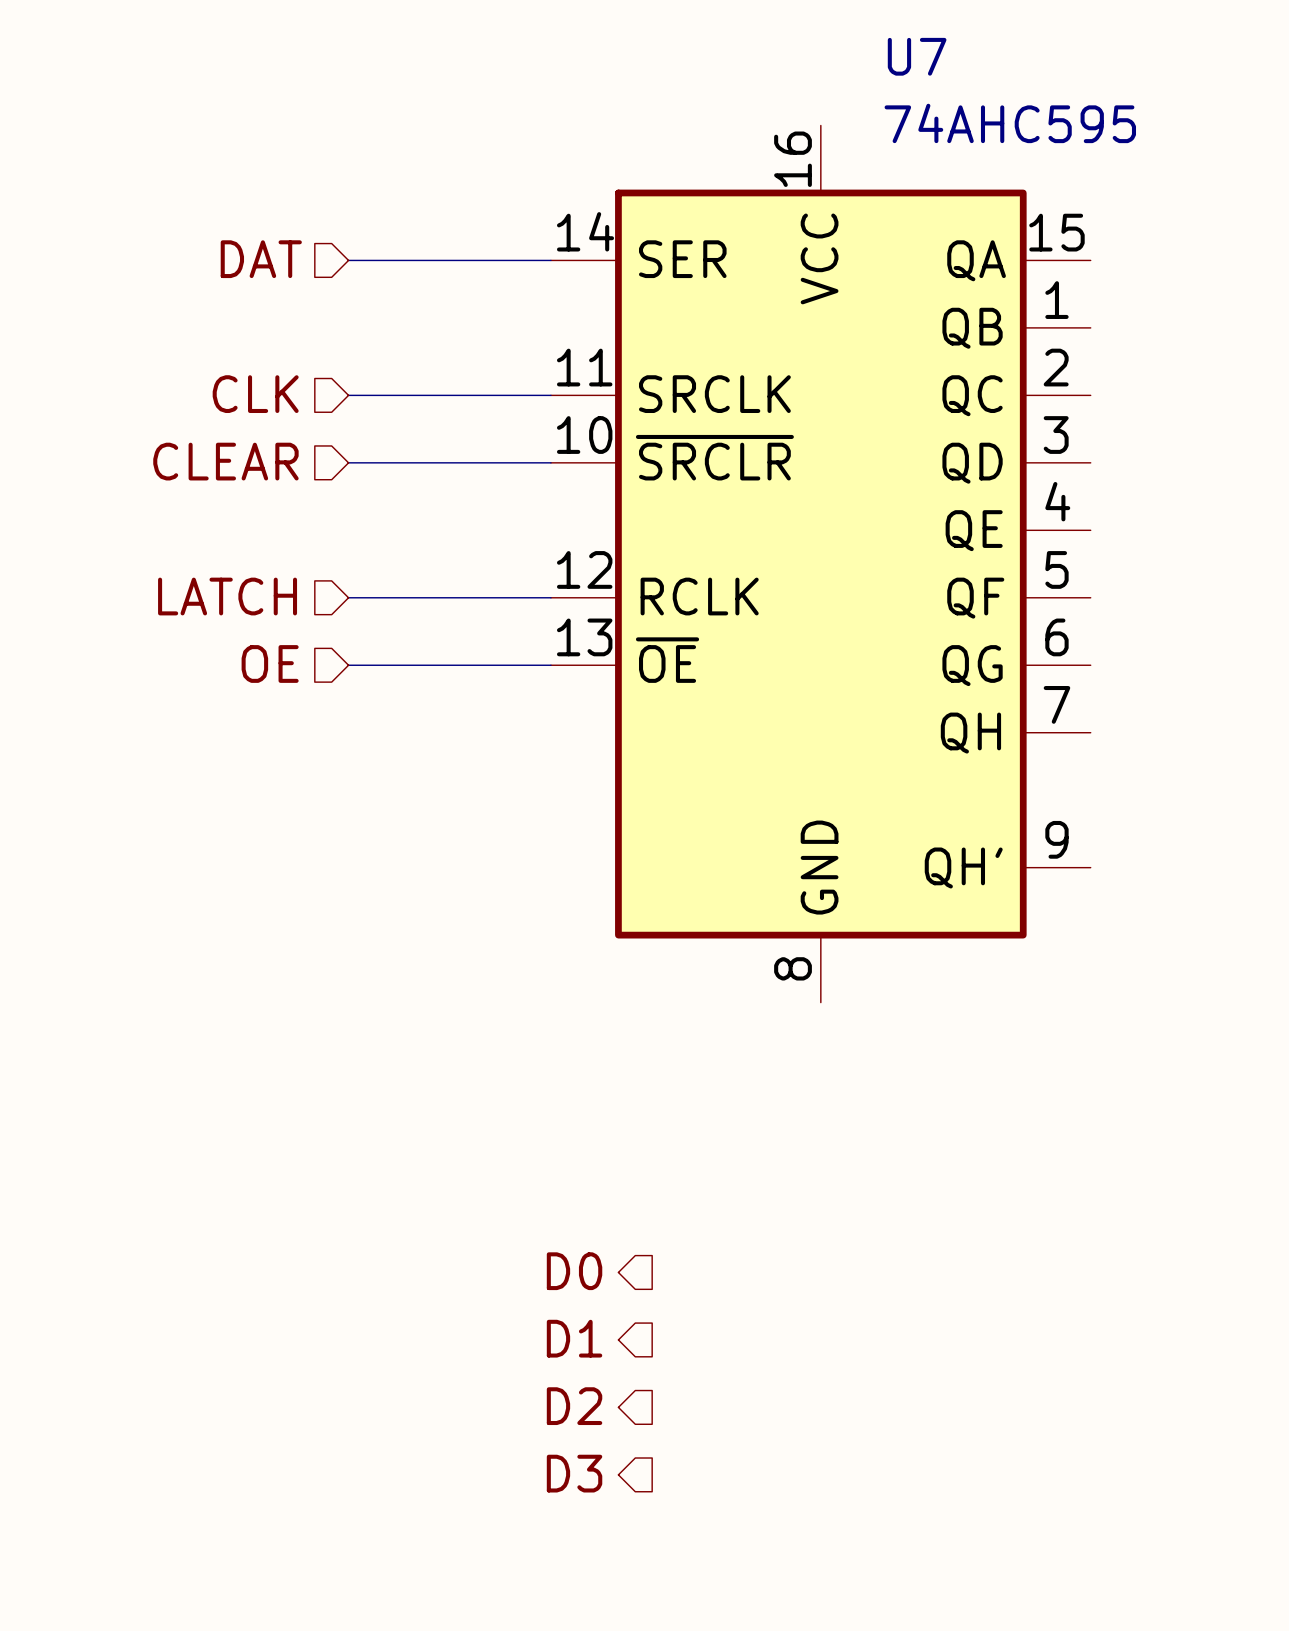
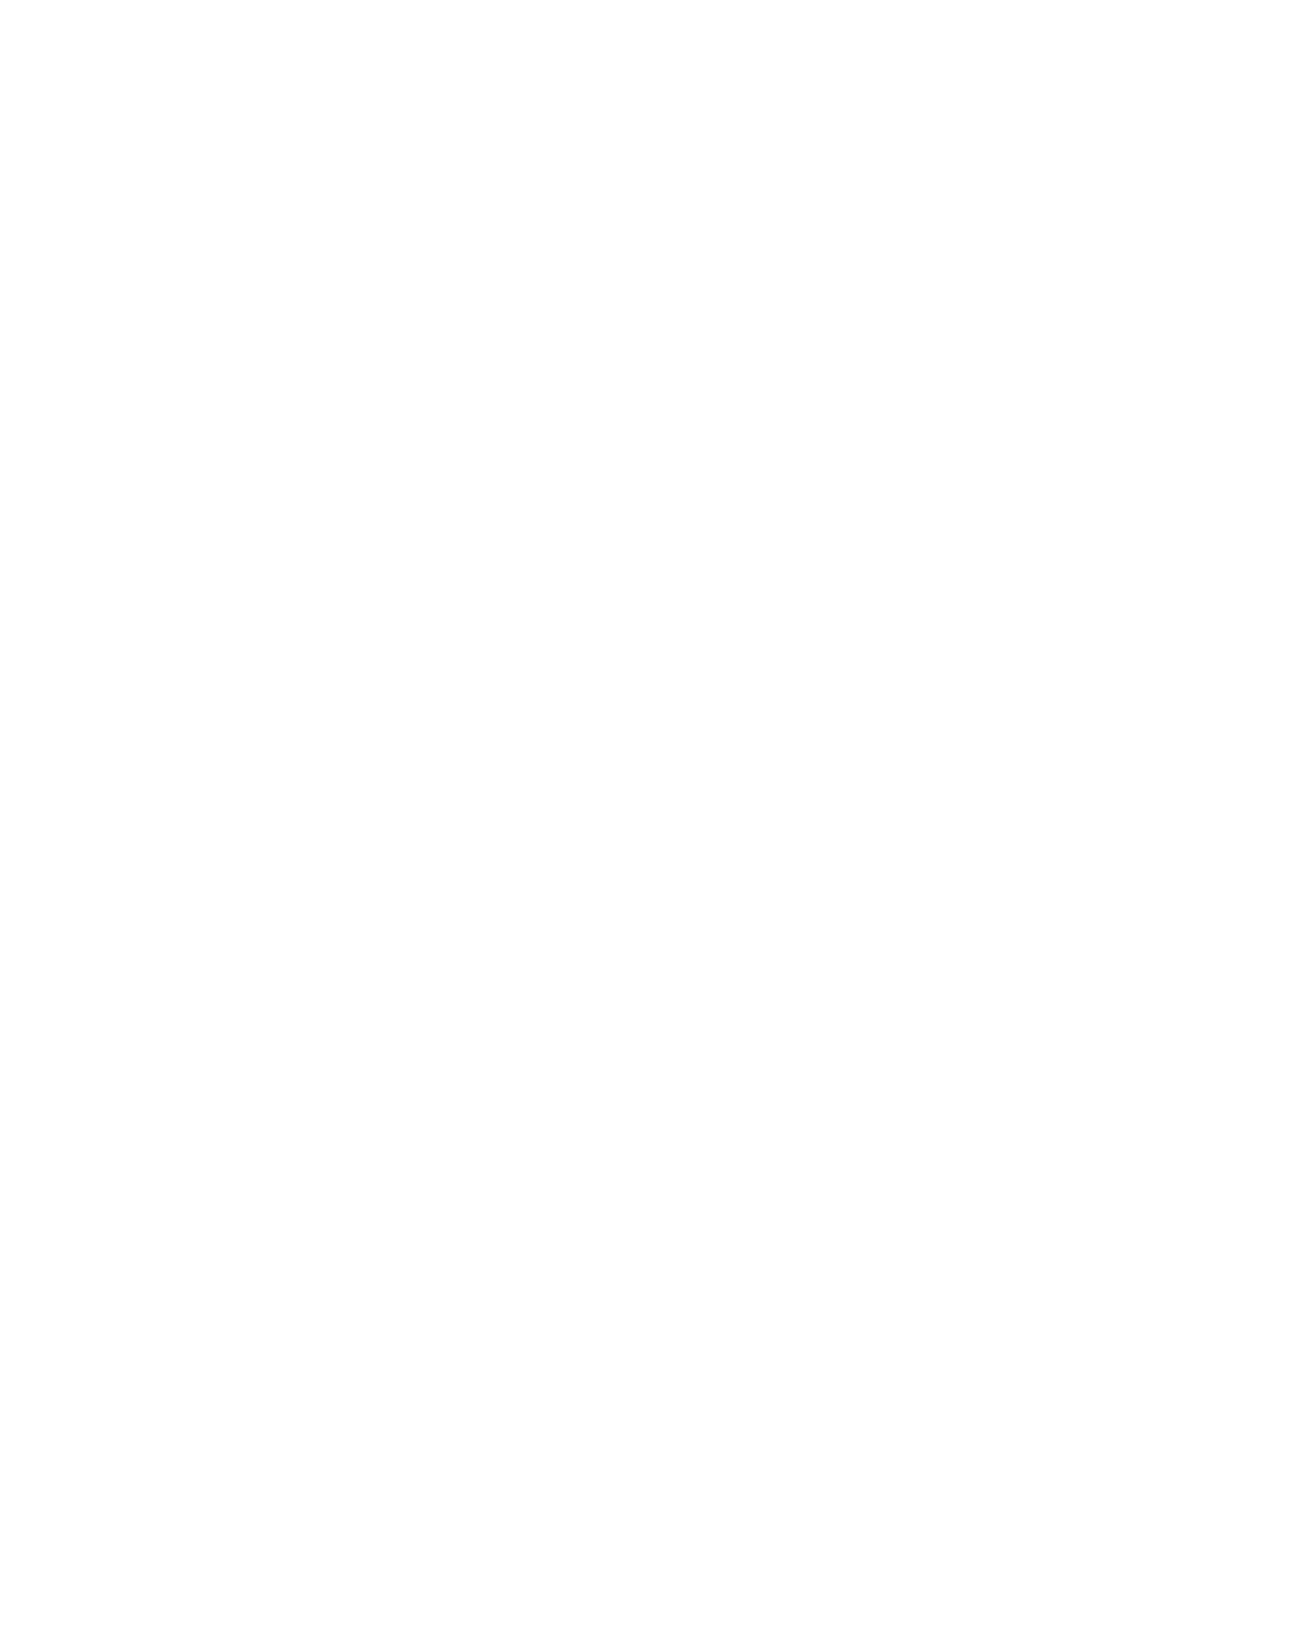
hierarchical label: DAT (261, 259) -> none
wire: (348, 260) (550, 260) -> none
hierarchical label: CLK (255, 394) -> none
wire: (348, 395) (550, 395) -> none
hierarchical label: CLEAR (225, 461) -> none
wire: (348, 462) (550, 462) -> none
U7: 74AHC595 (820, 564) -> none
hierarchical label: LATCH (227, 596) -> none
wire: (348, 597) (550, 597) -> none
hierarchical label: OE (270, 663) -> none
wire: (348, 665) (550, 665) -> none
hierarchical label: D0 (574, 1271) -> none
hierarchical label: D1 (574, 1338) -> none
hierarchical label: D2 (574, 1406) -> none
hierarchical label: D3 (574, 1473) -> none

